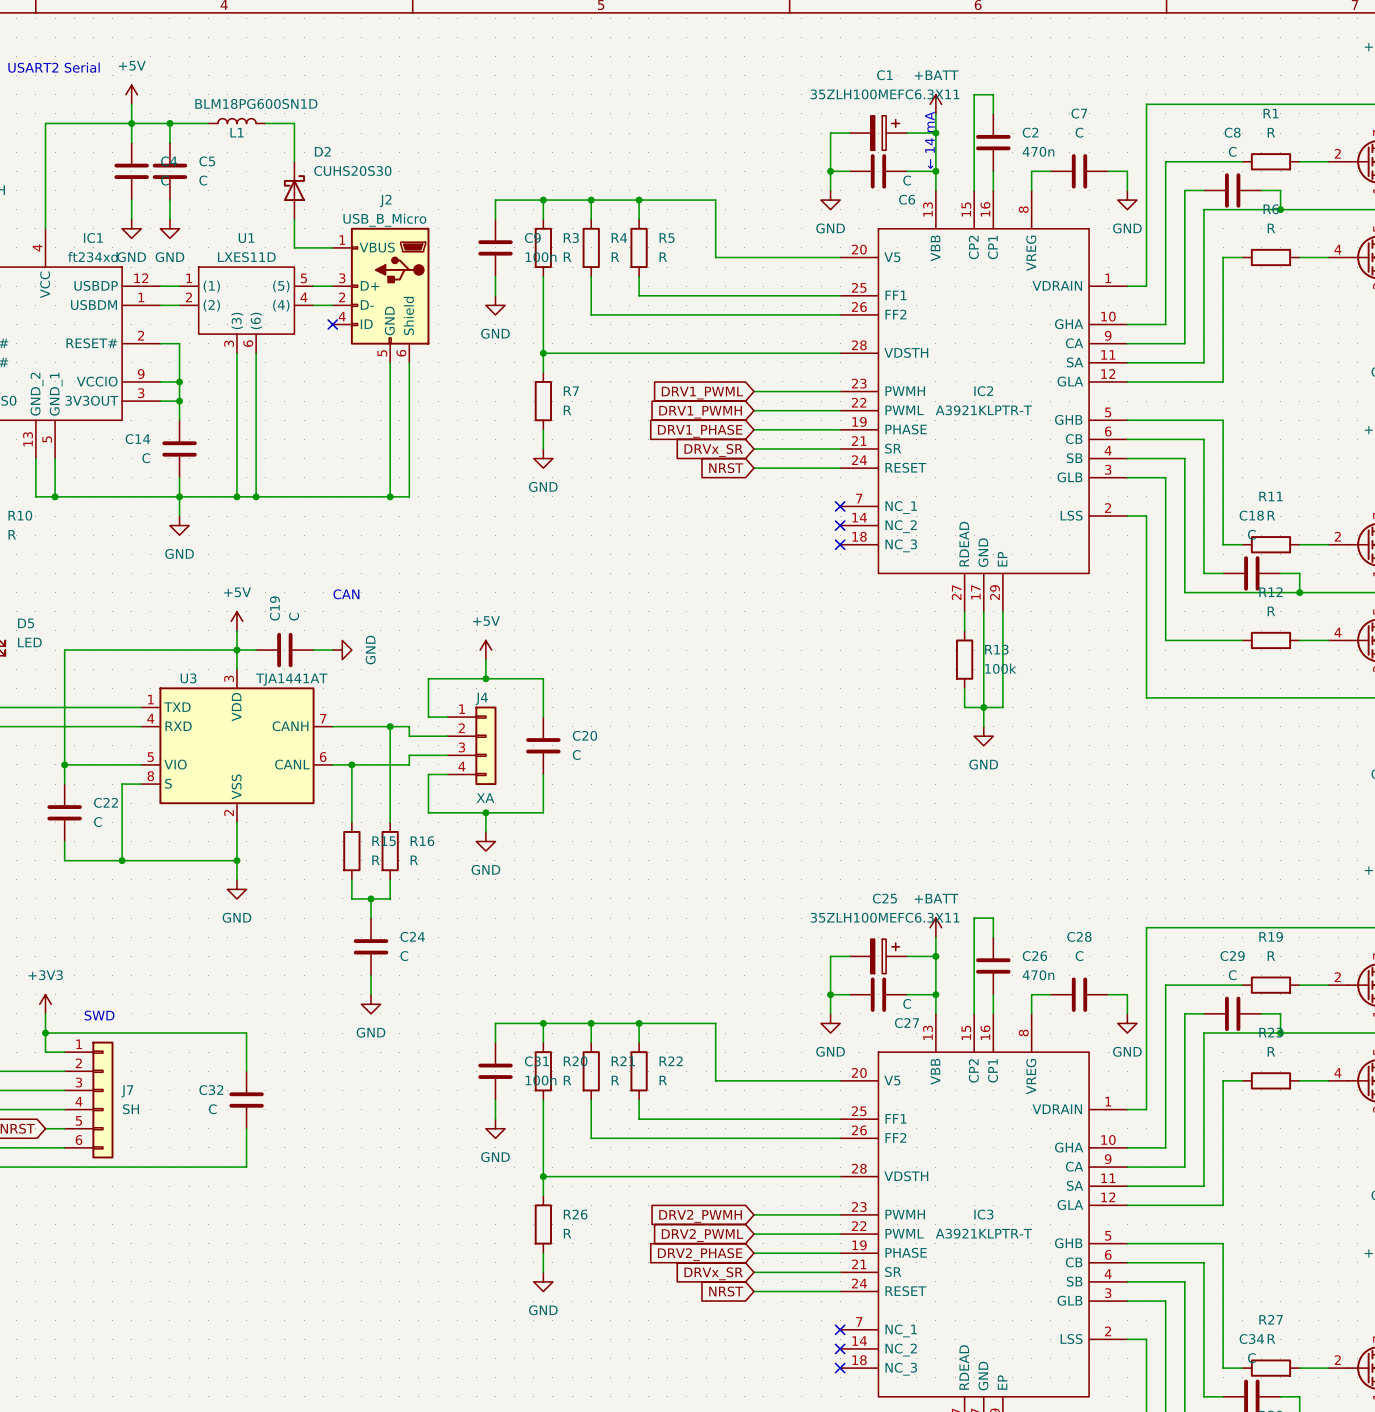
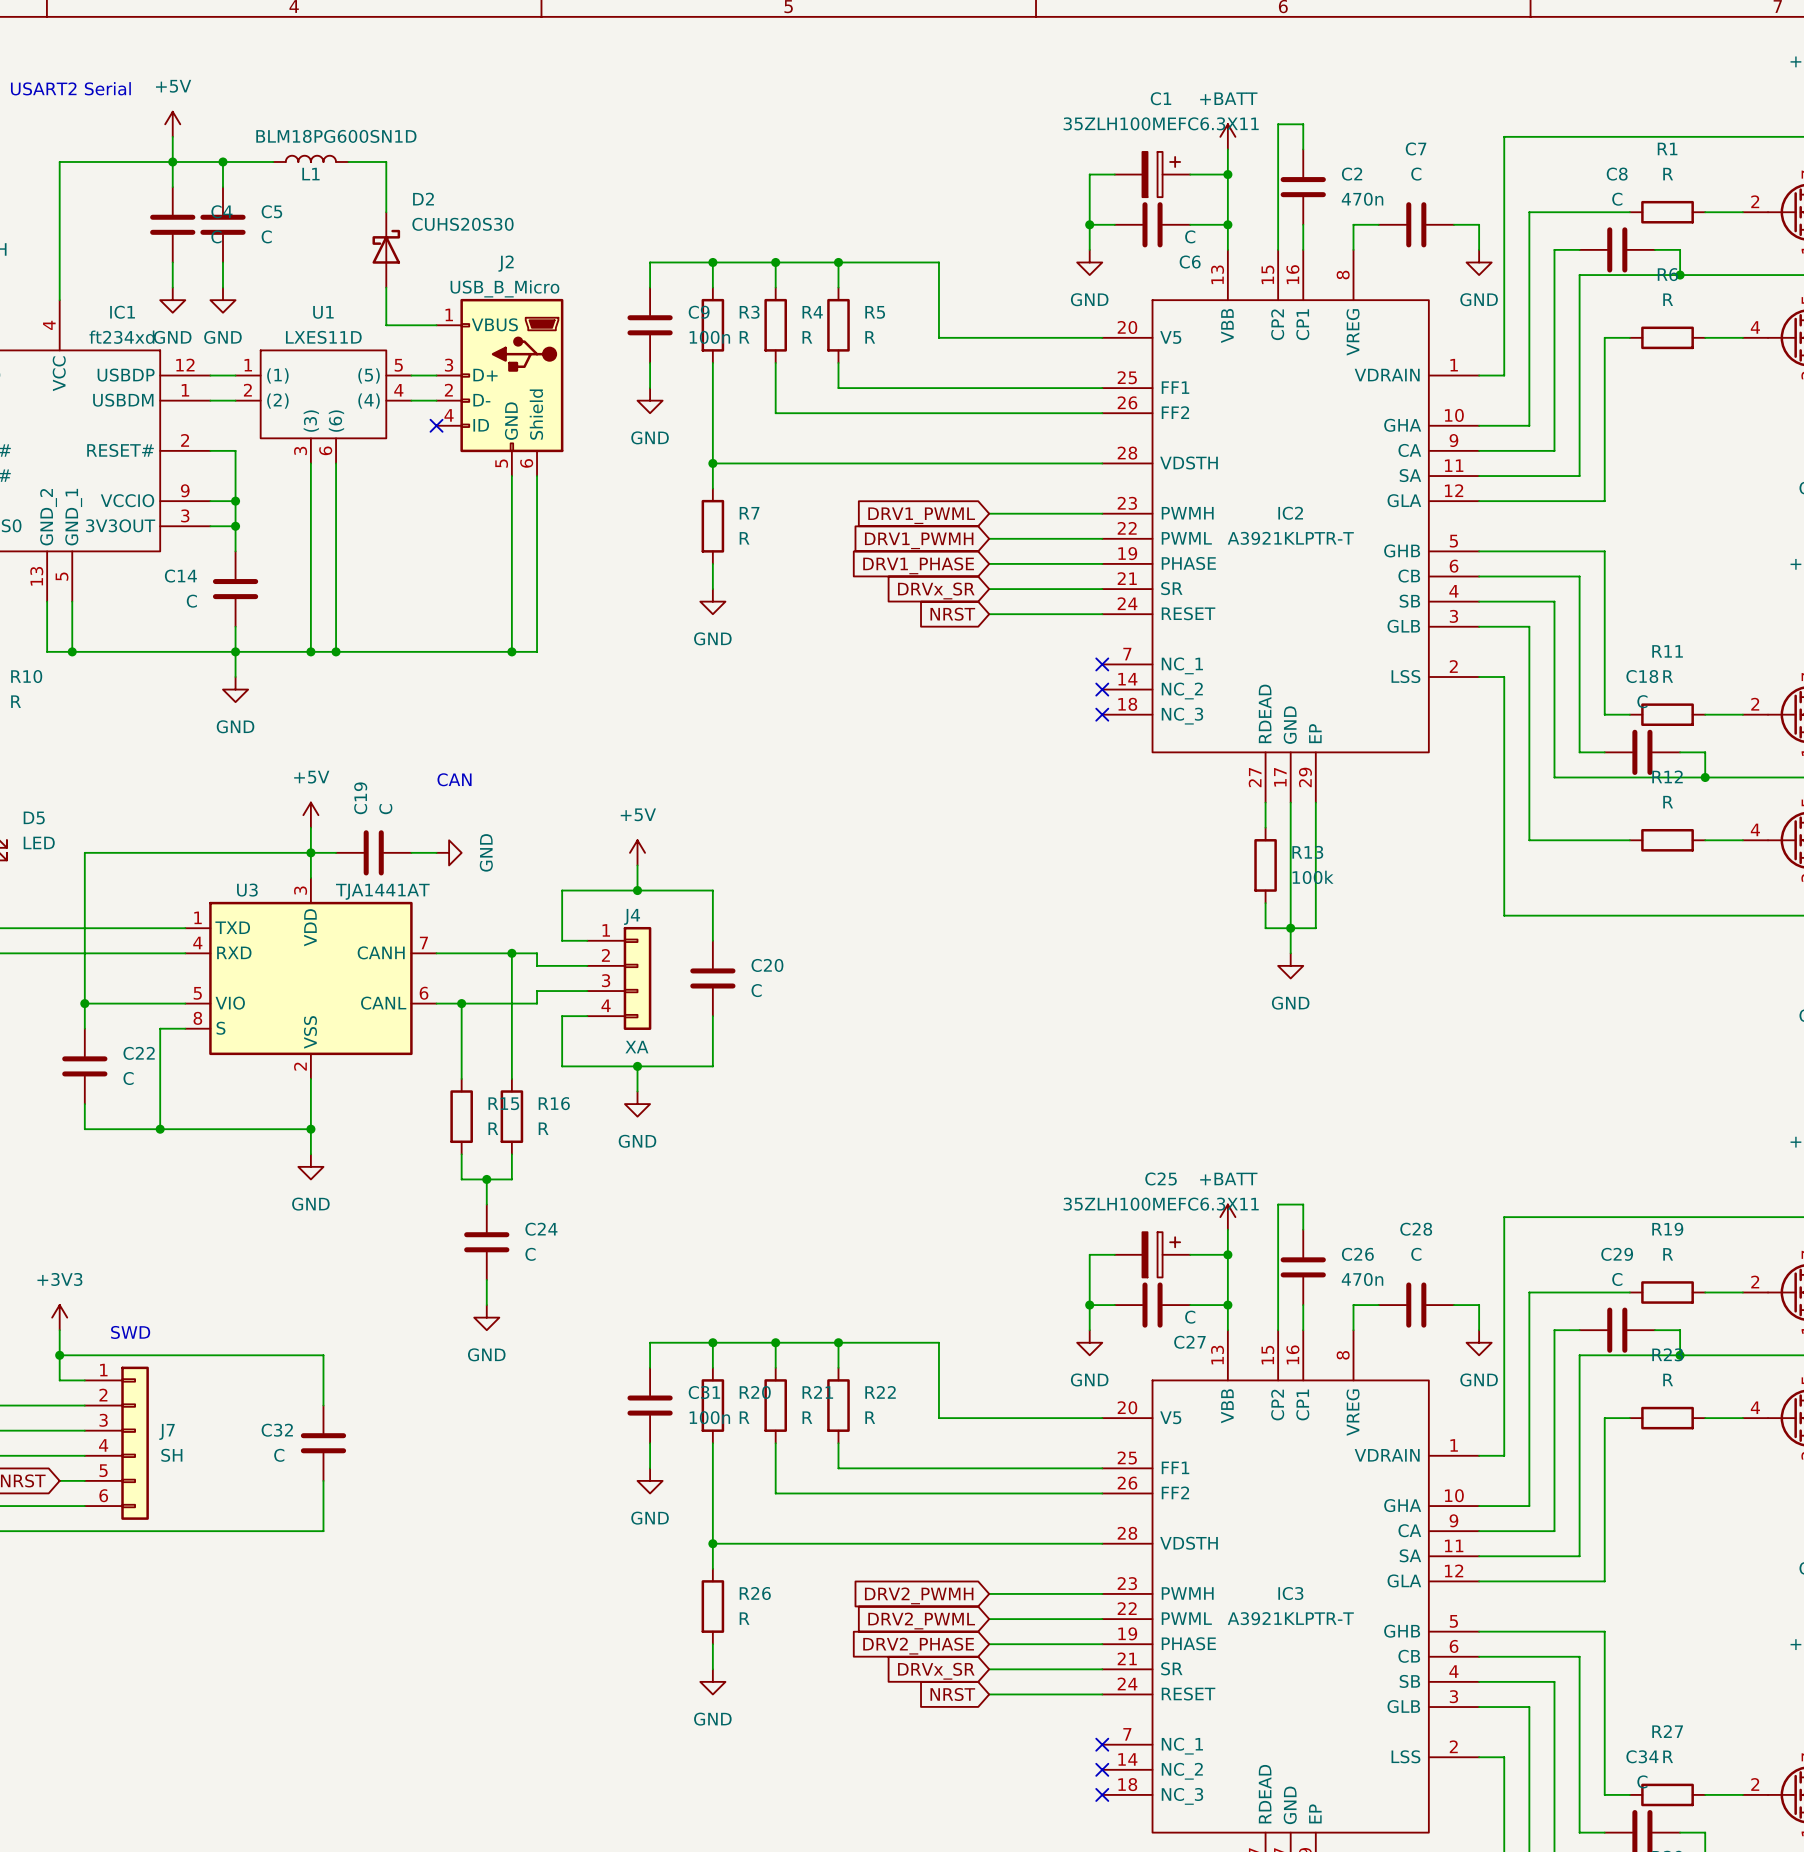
text: ← 14 mA (929, 140) -> none

